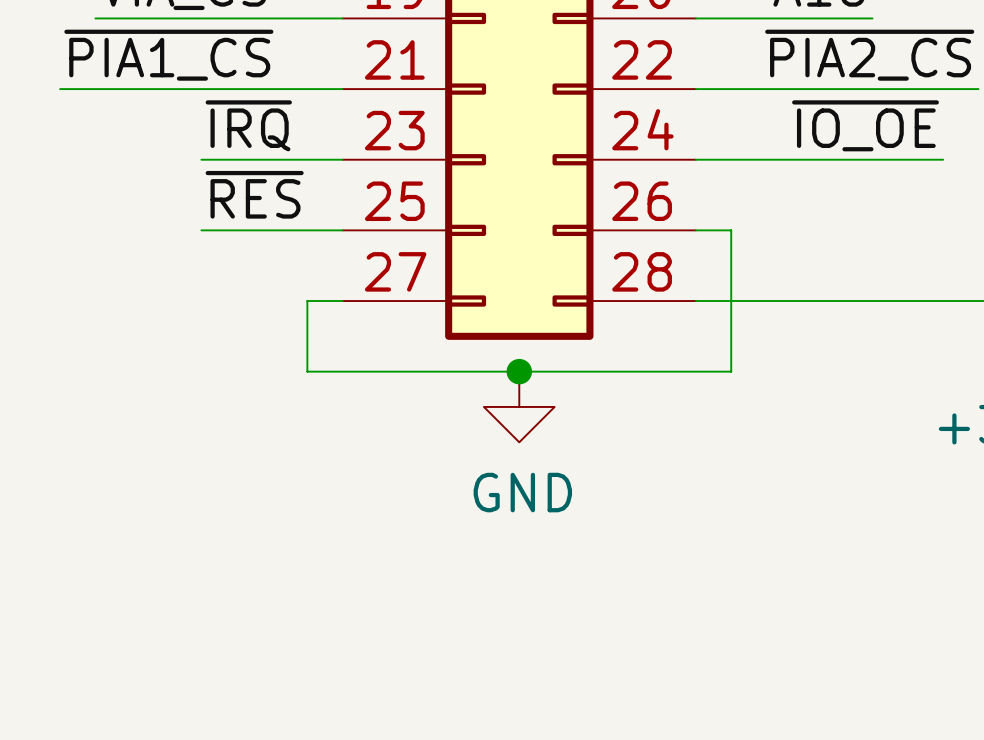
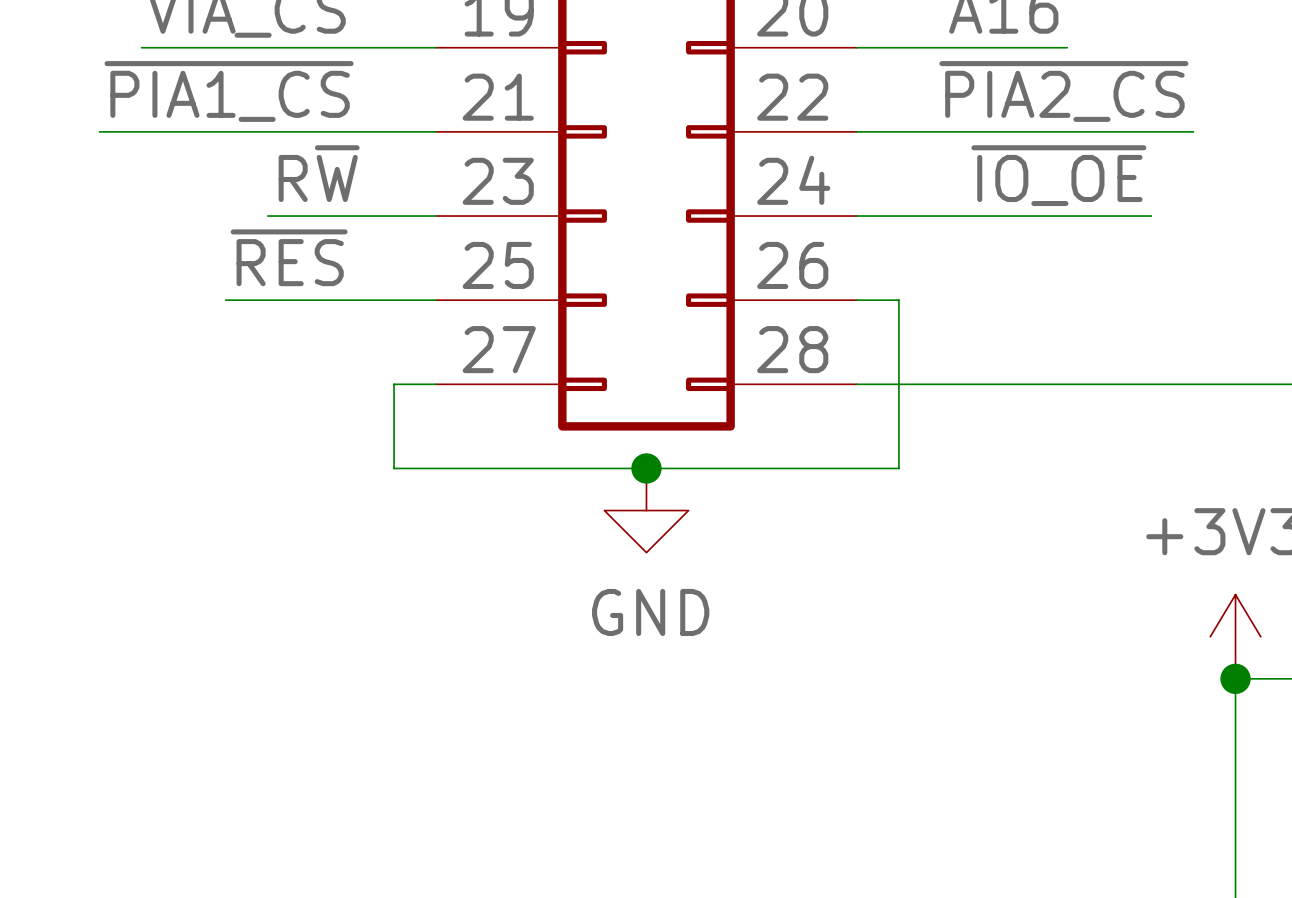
label: ~{IRQ} (248, 125) -> R~{W} (319, 173)
label position: ~{RES} (254, 194) -> ~{RES} (289, 257)
wire: none -> (225, 300) (267, 300)

